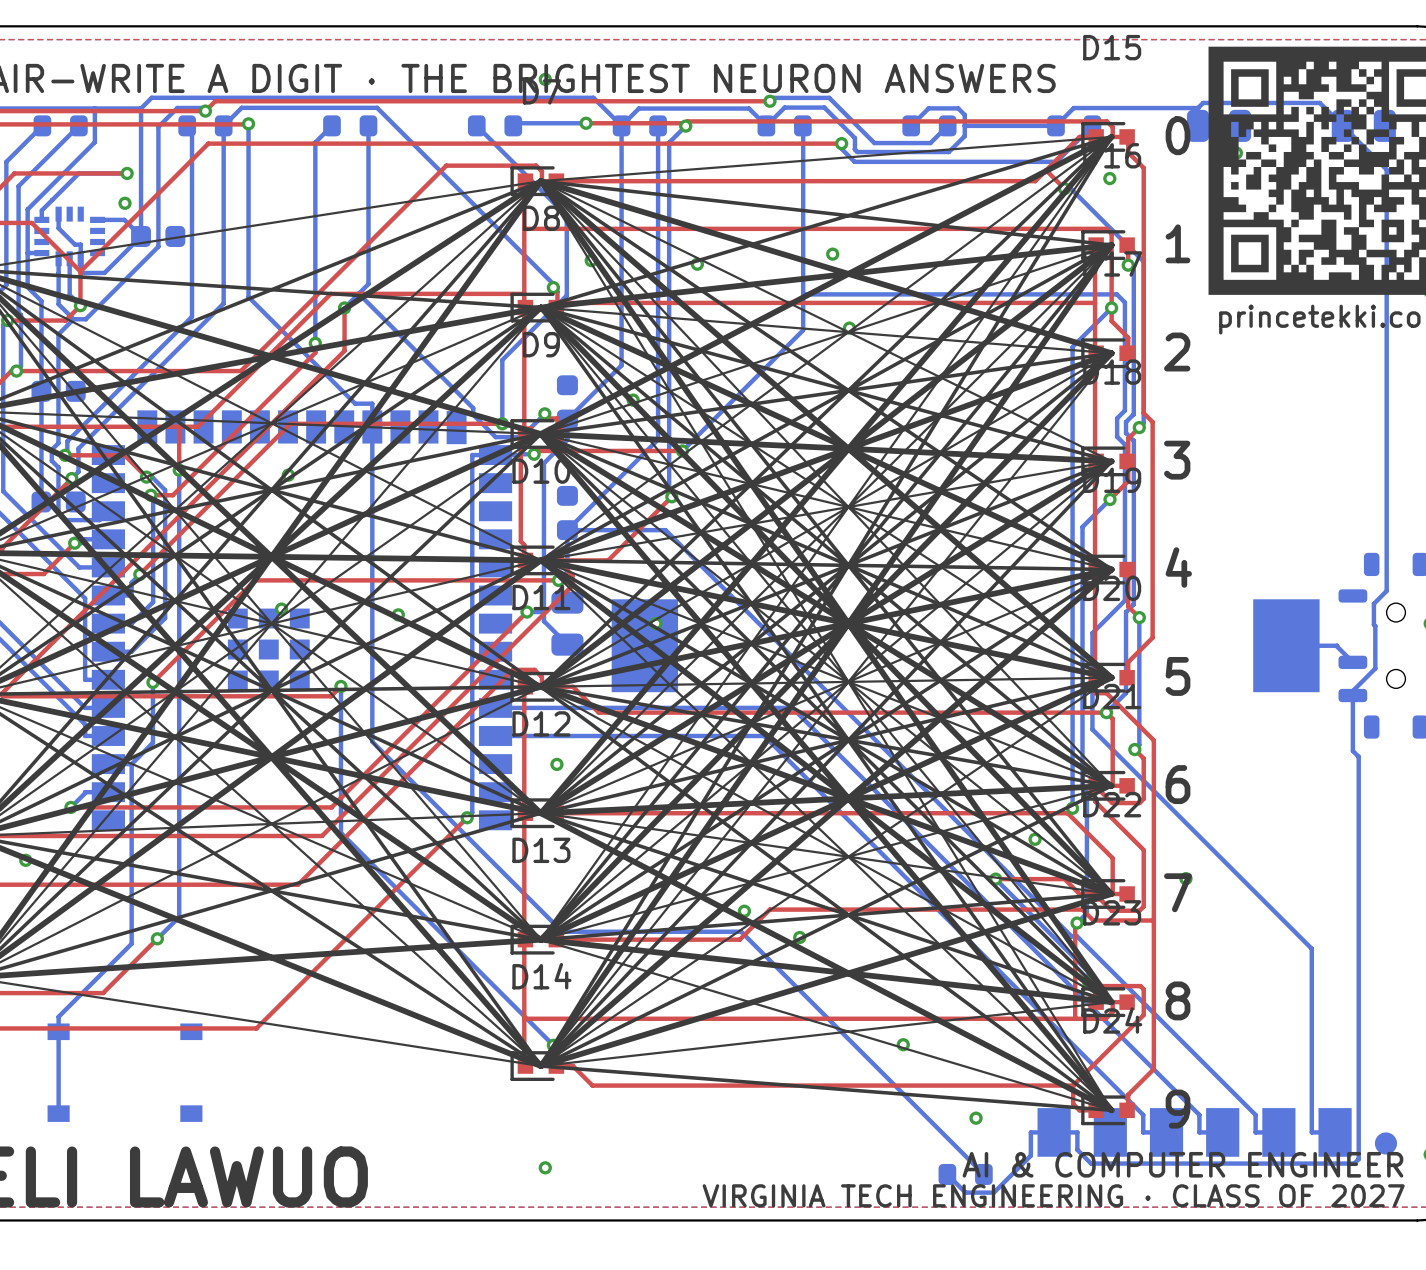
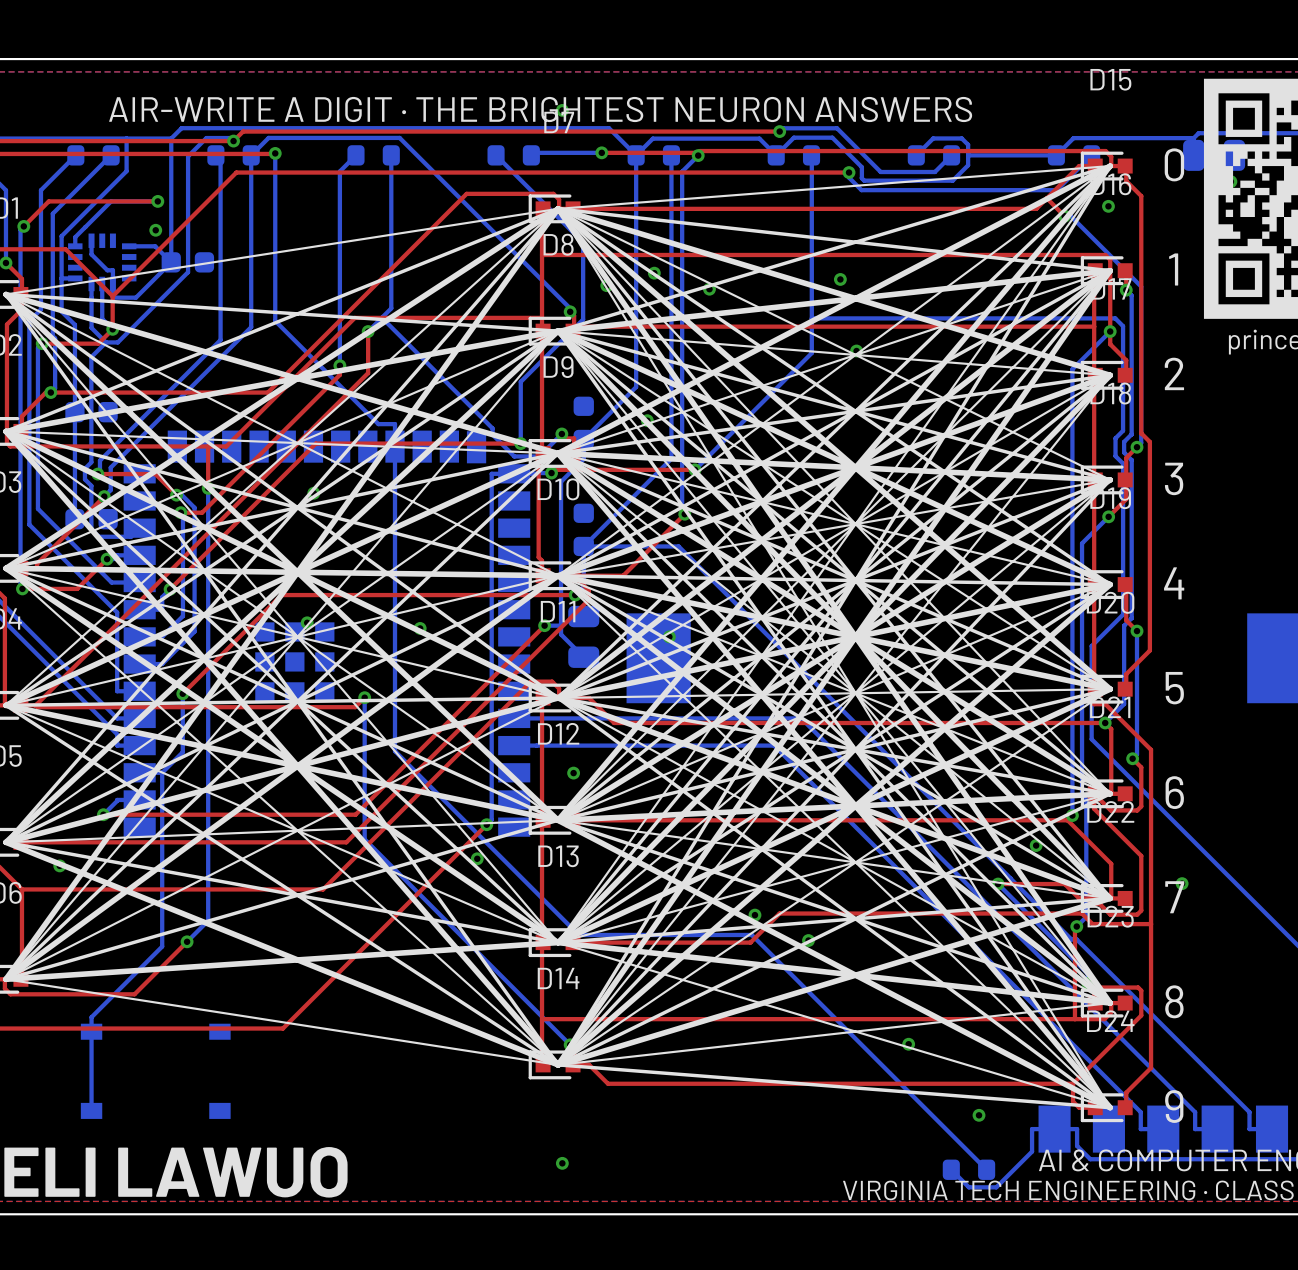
via: none -> (654, 273)
via: none -> (477, 858)

